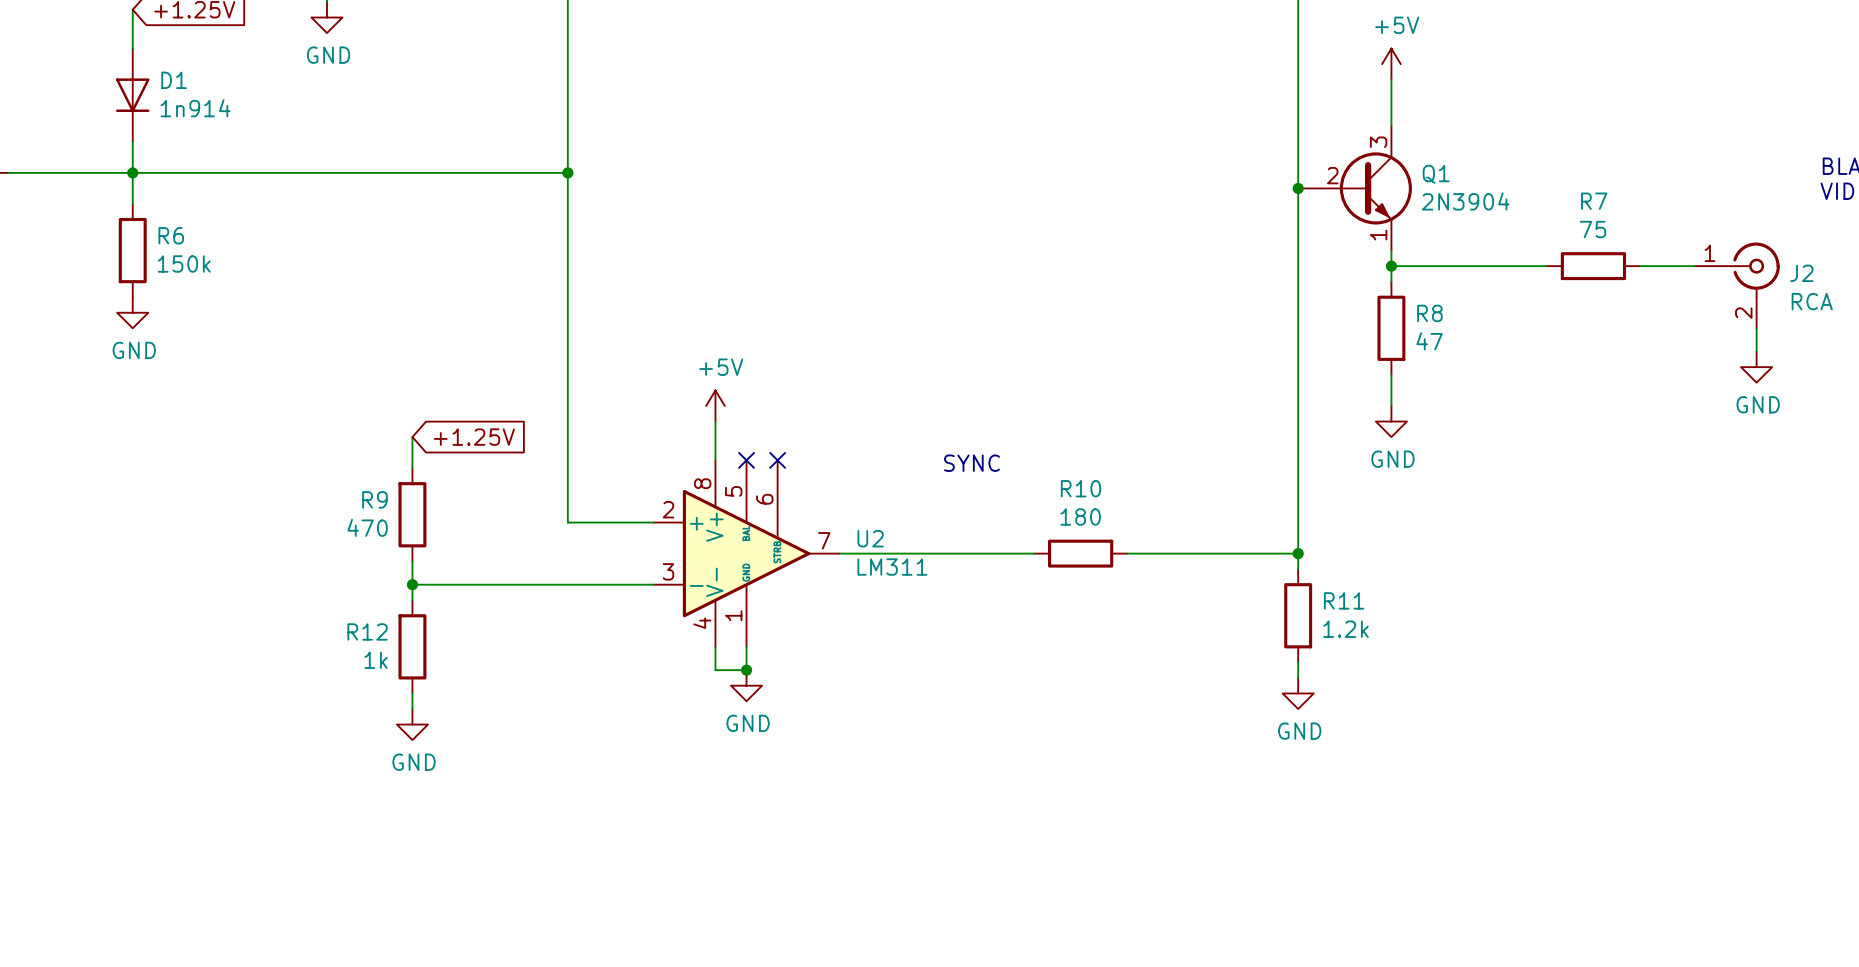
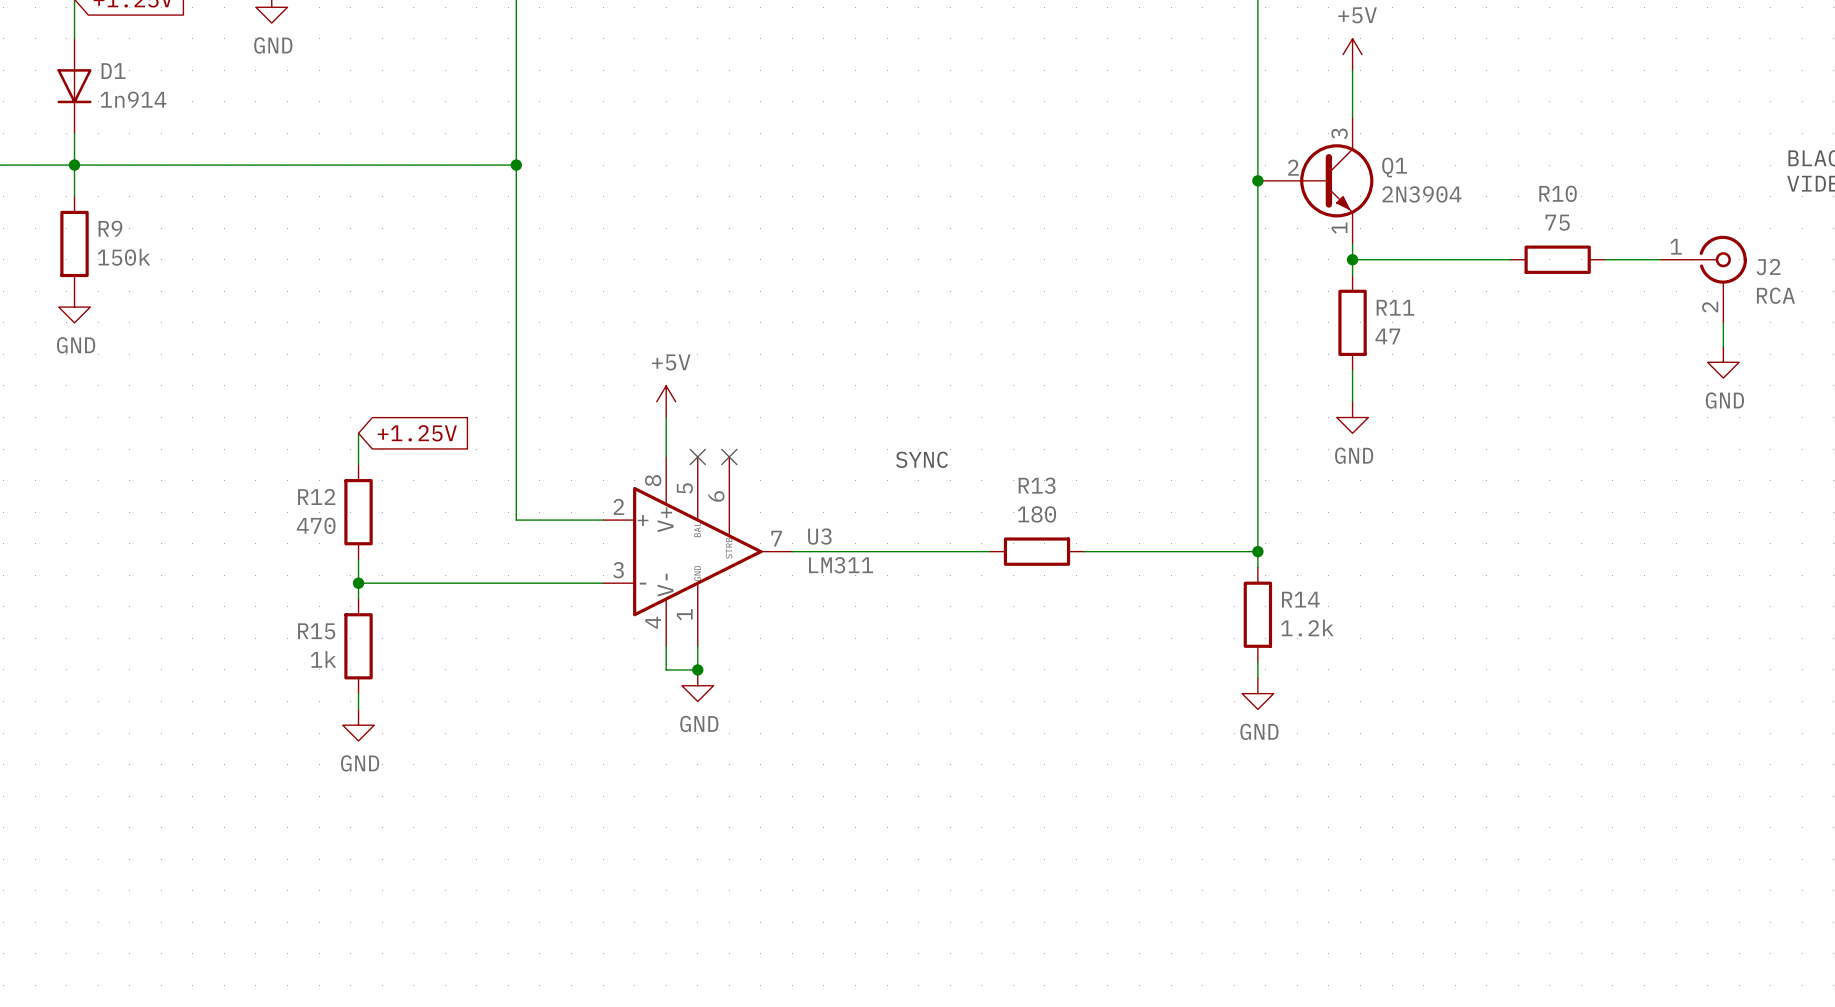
R7 name: R7 (1594, 201) -> R10 (1558, 193)
R6 name: R6 (171, 235) -> R9 (110, 228)
R8 name: R8 (1429, 313) -> R11 (1395, 307)
R10 name: R10 (1081, 488) -> R13 (1037, 485)
R9 name: R9 (374, 499) -> R12 (316, 496)
U2 name: U2 (870, 538) -> U3 (819, 536)
R11 name: R11 (1344, 600) -> R14 (1300, 599)
R12 name: R12 (367, 631) -> R15 (316, 631)

